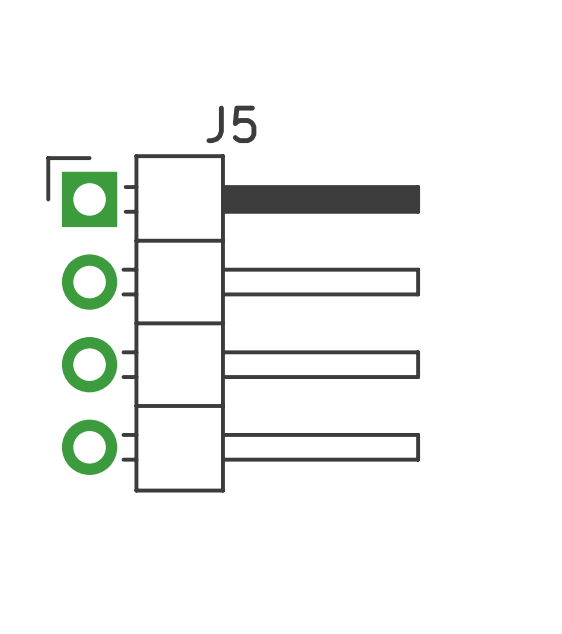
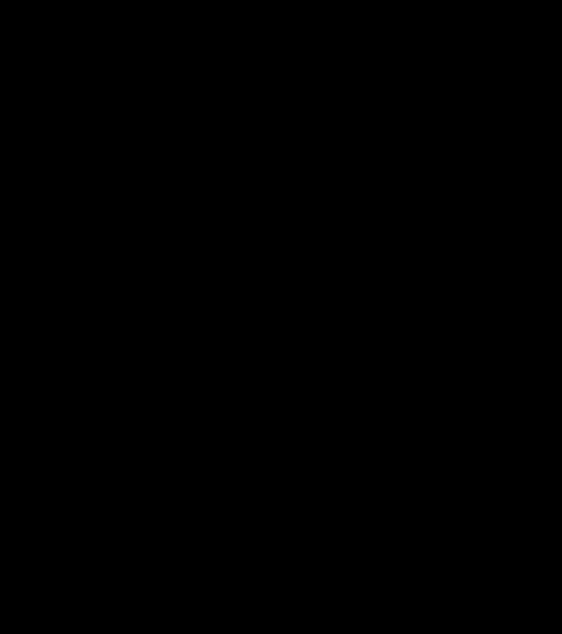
J5: (233, 323) -> none

